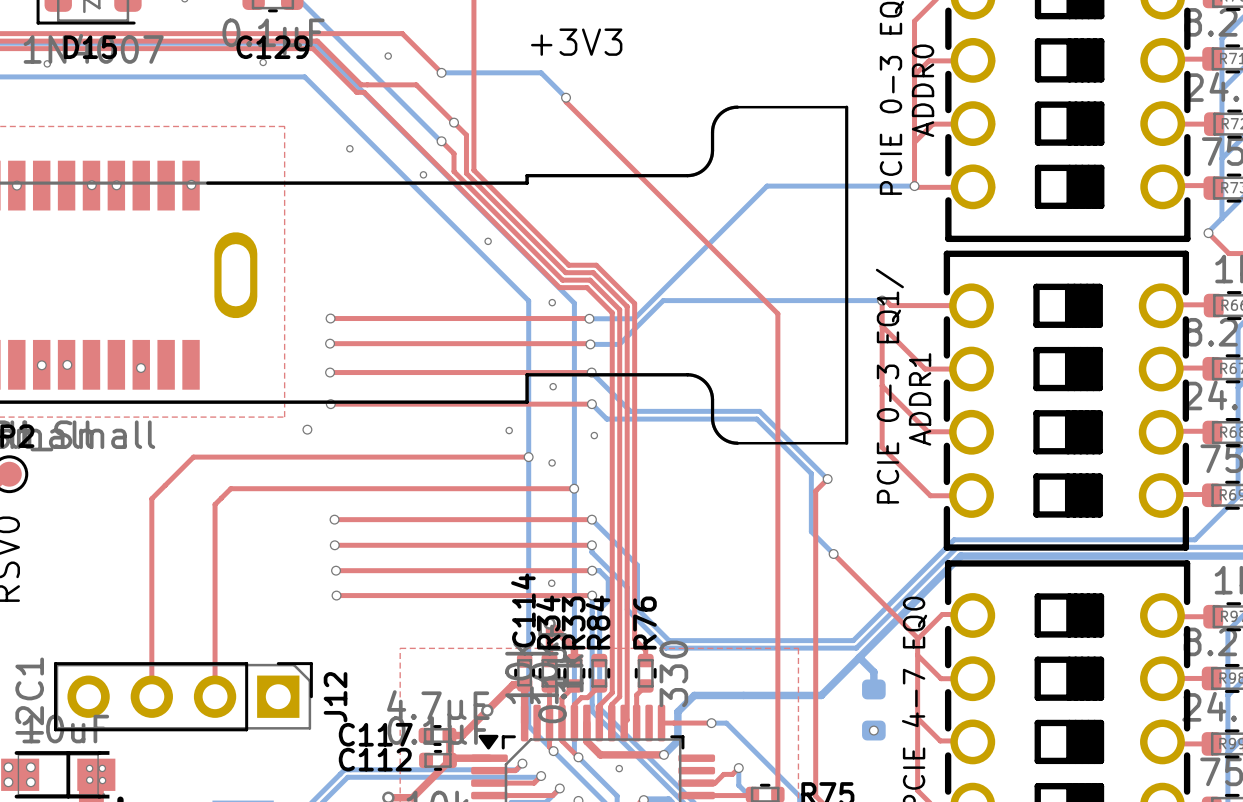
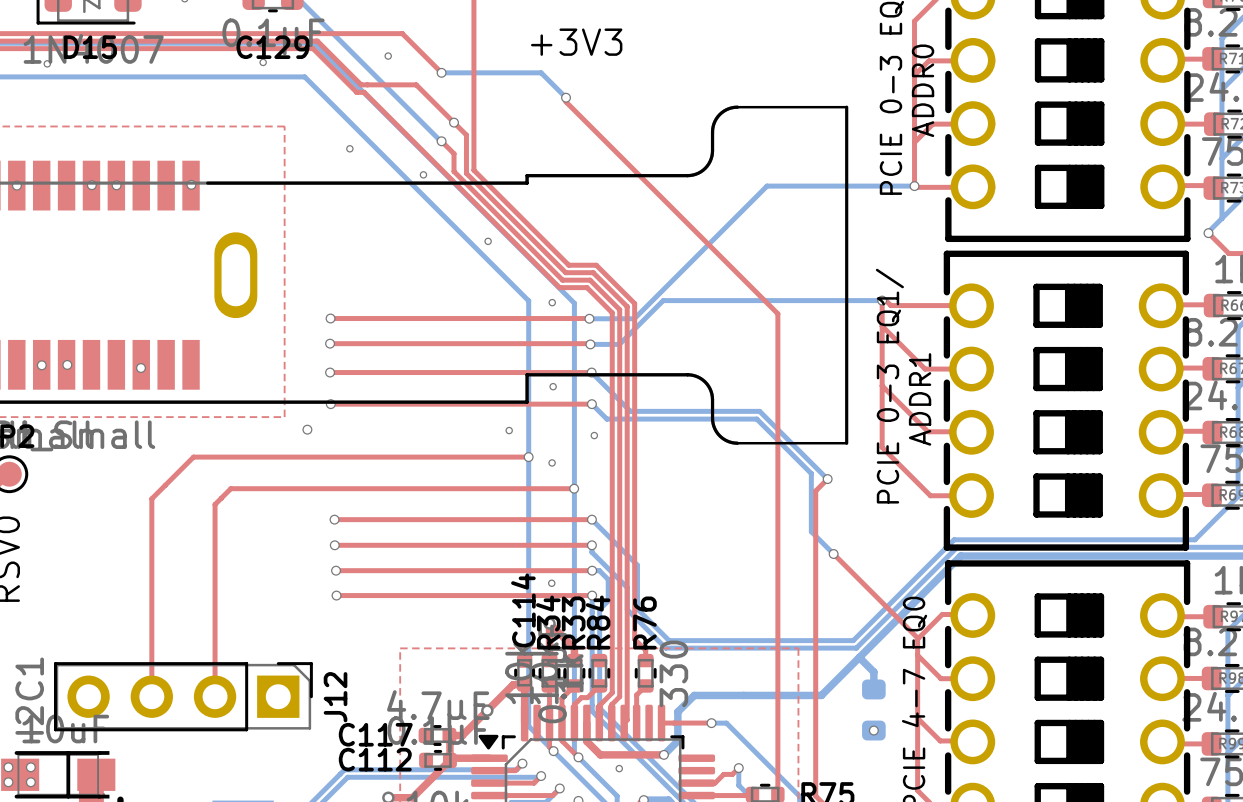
via: (89, 768) -> none
via: (102, 768) -> none
via: (89, 780) -> none
via: (102, 780) -> none

